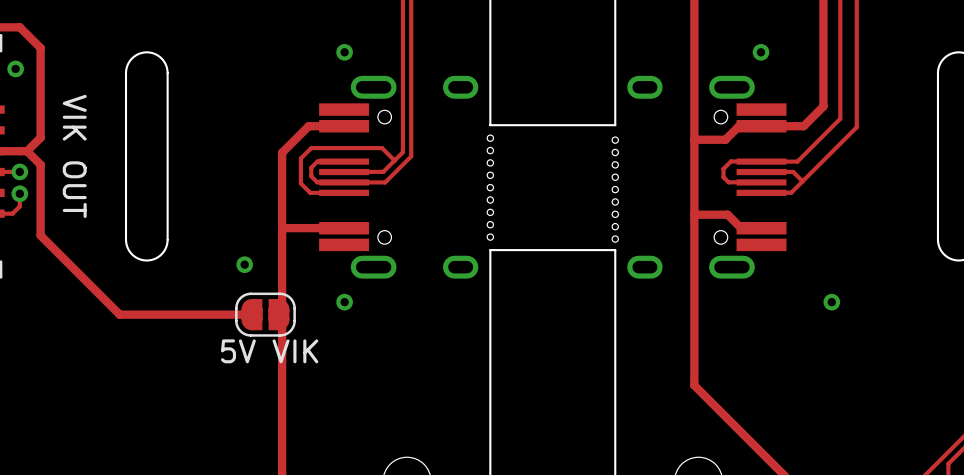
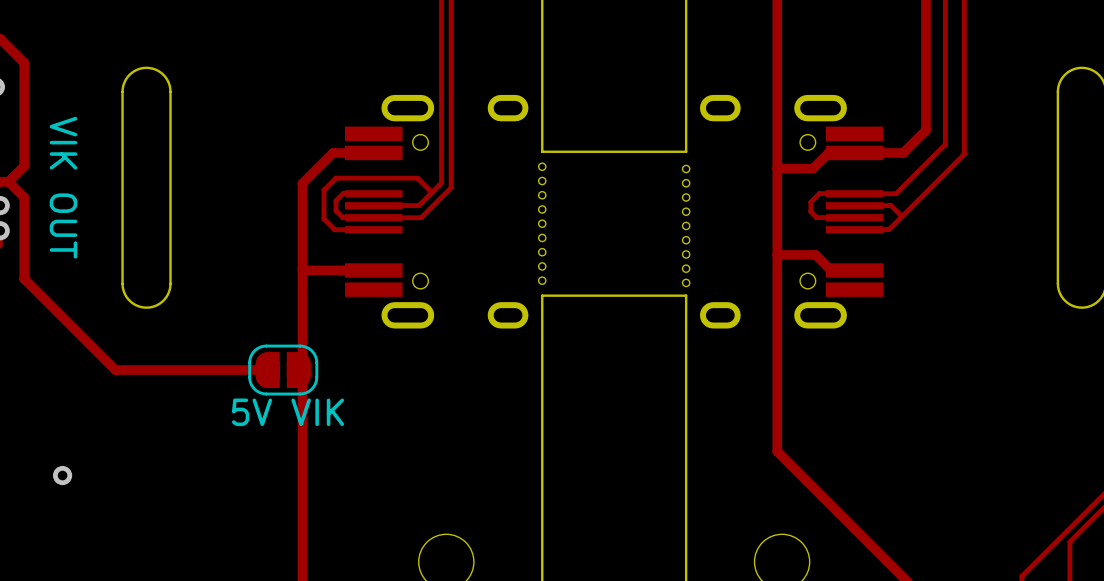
via: (344, 52) -> none
via: (761, 52) -> none
via: (244, 264) -> none
via: (344, 302) -> none
via: (831, 302) -> none
via: none -> (62, 475)

